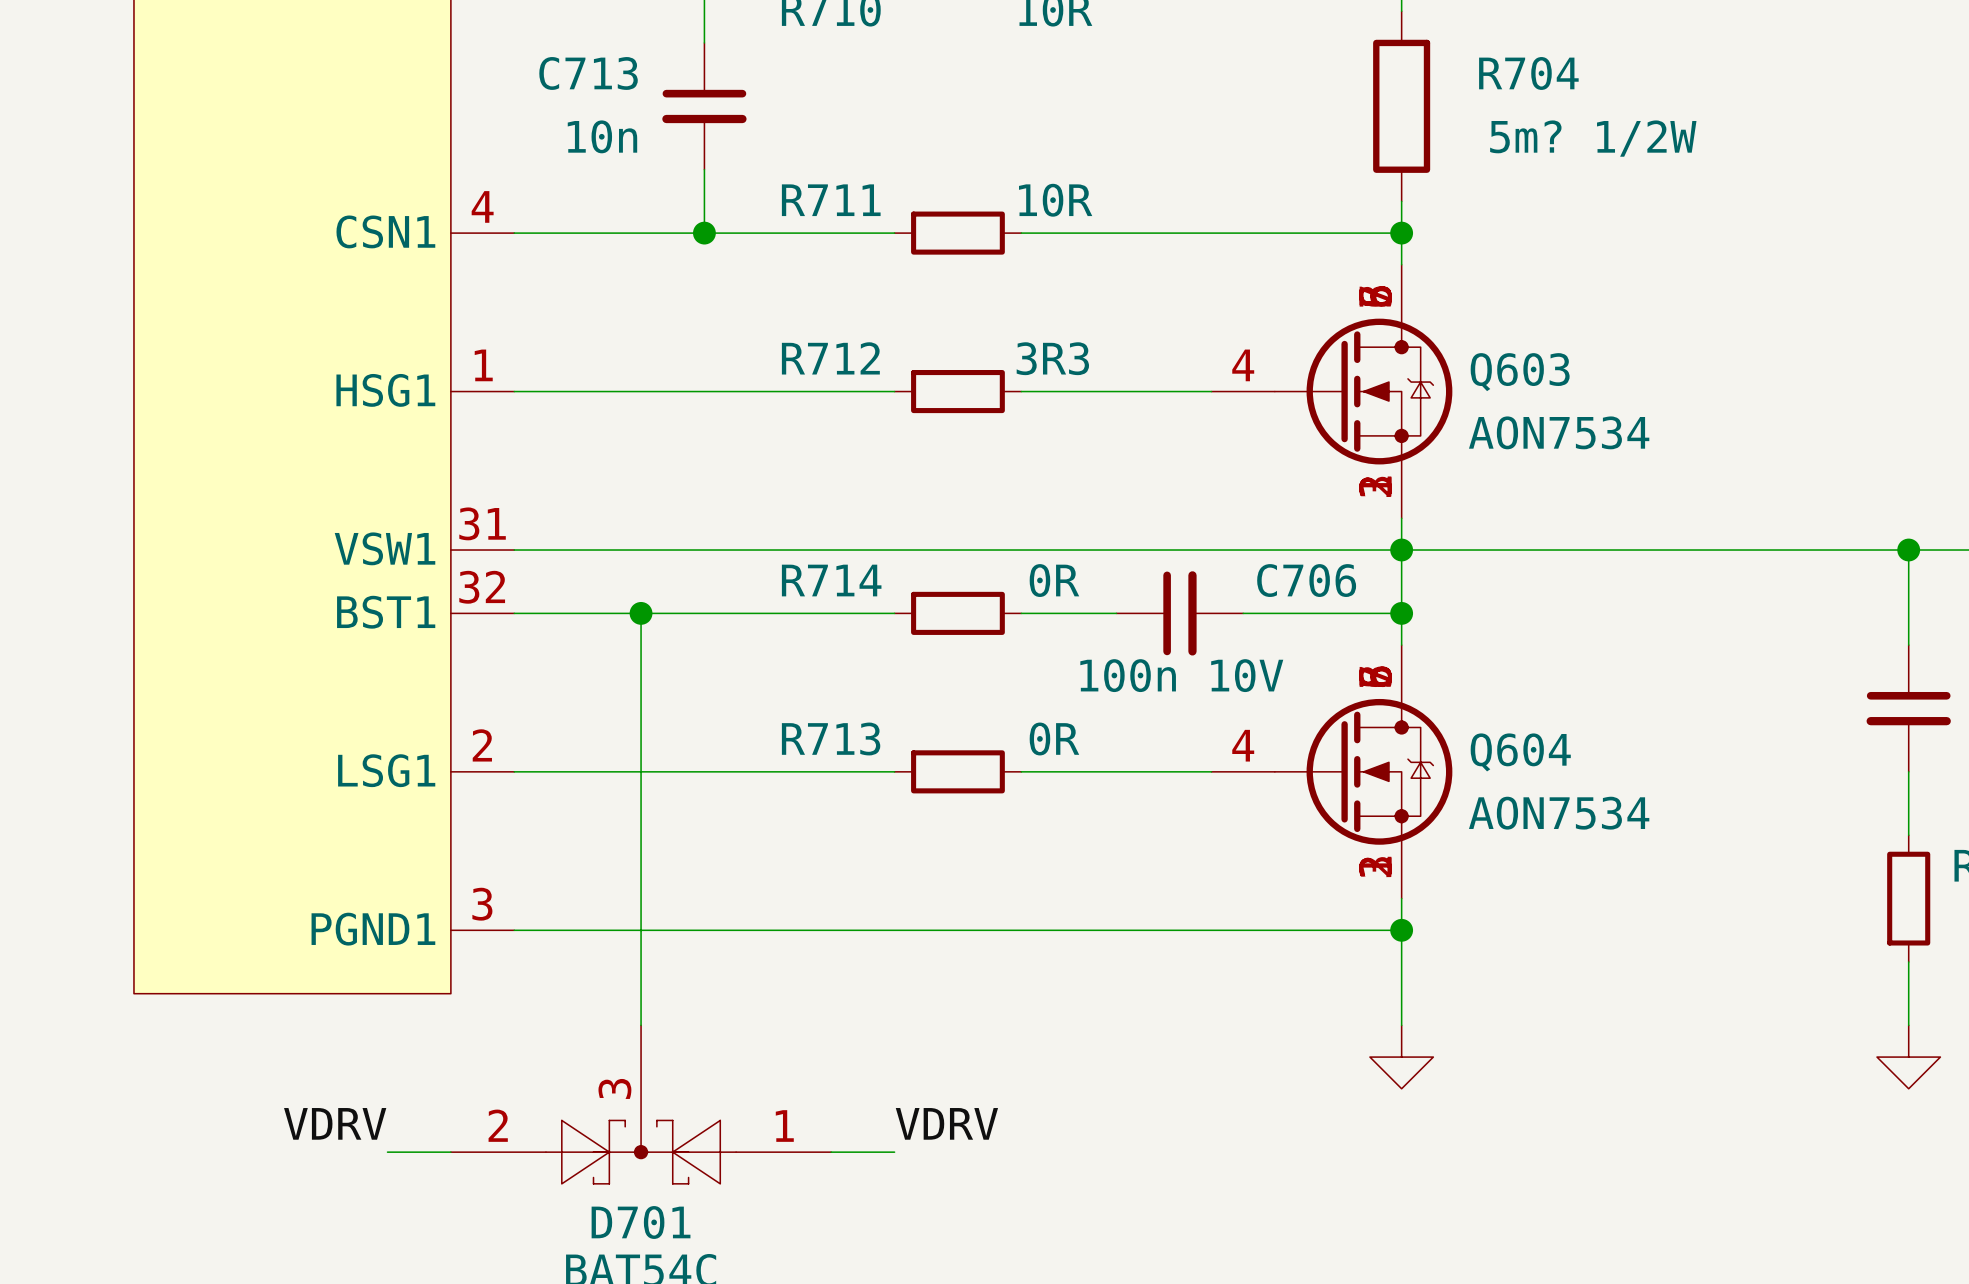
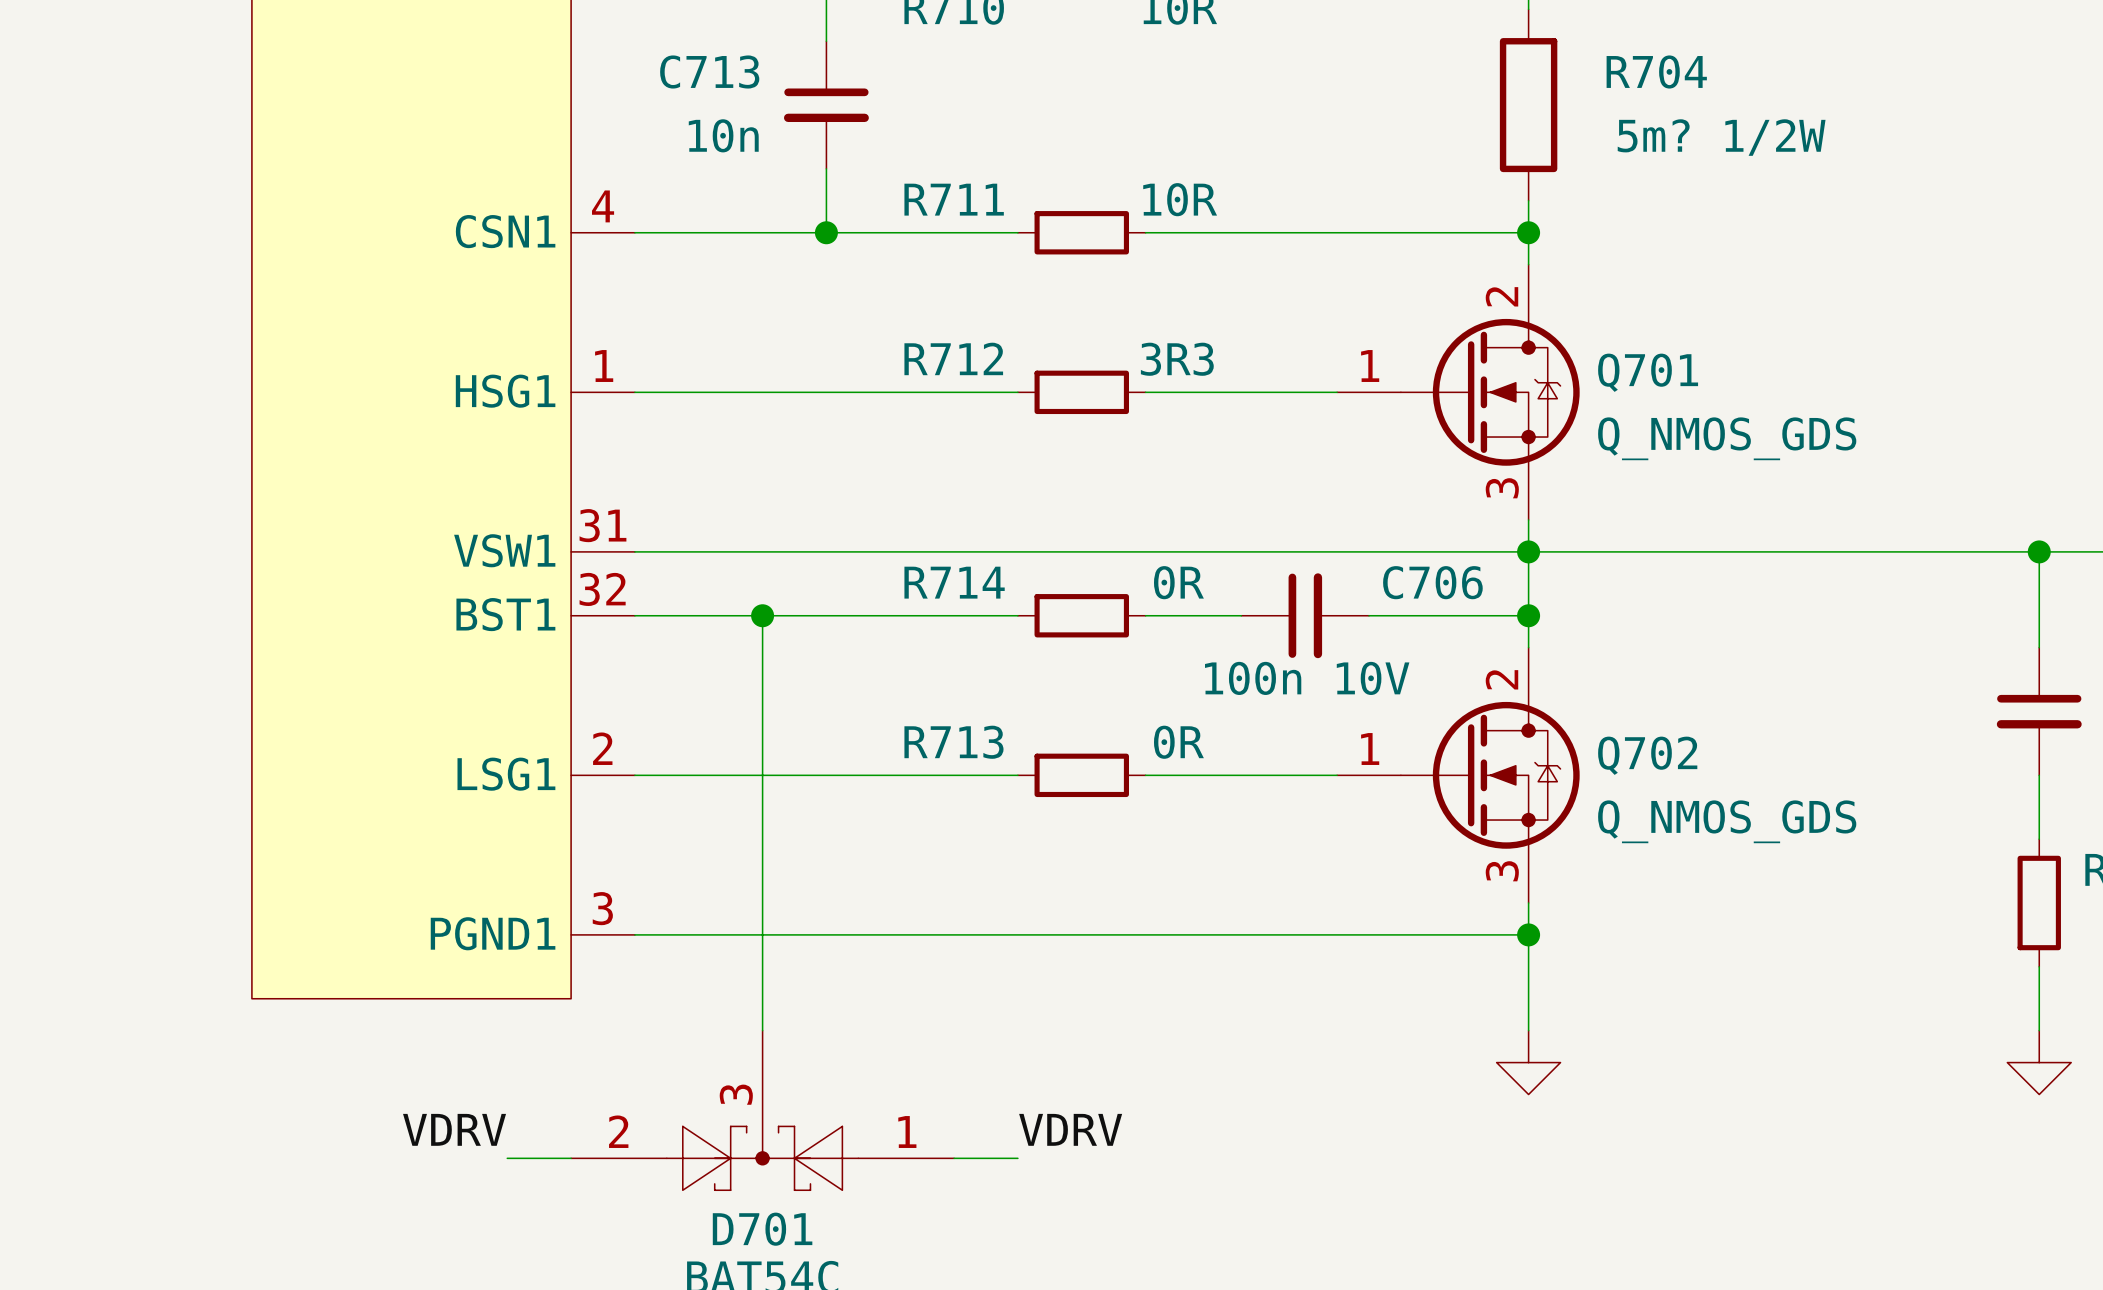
Q603 symbol: [1211, 264, 1453, 519] -> [1337, 264, 1580, 521]
Q603 name: Q603 (1520, 372) -> Q701 (1648, 372)
Q603 value: AON7534 (1559, 432) -> Q_NMOS_GDS (1727, 438)
Q604 symbol: [1211, 645, 1453, 899] -> [1337, 647, 1580, 904]
Q604 name: Q604 (1520, 752) -> Q702 (1647, 755)
Q604 value: AON7534 (1559, 813) -> Q_NMOS_GDS (1727, 821)

